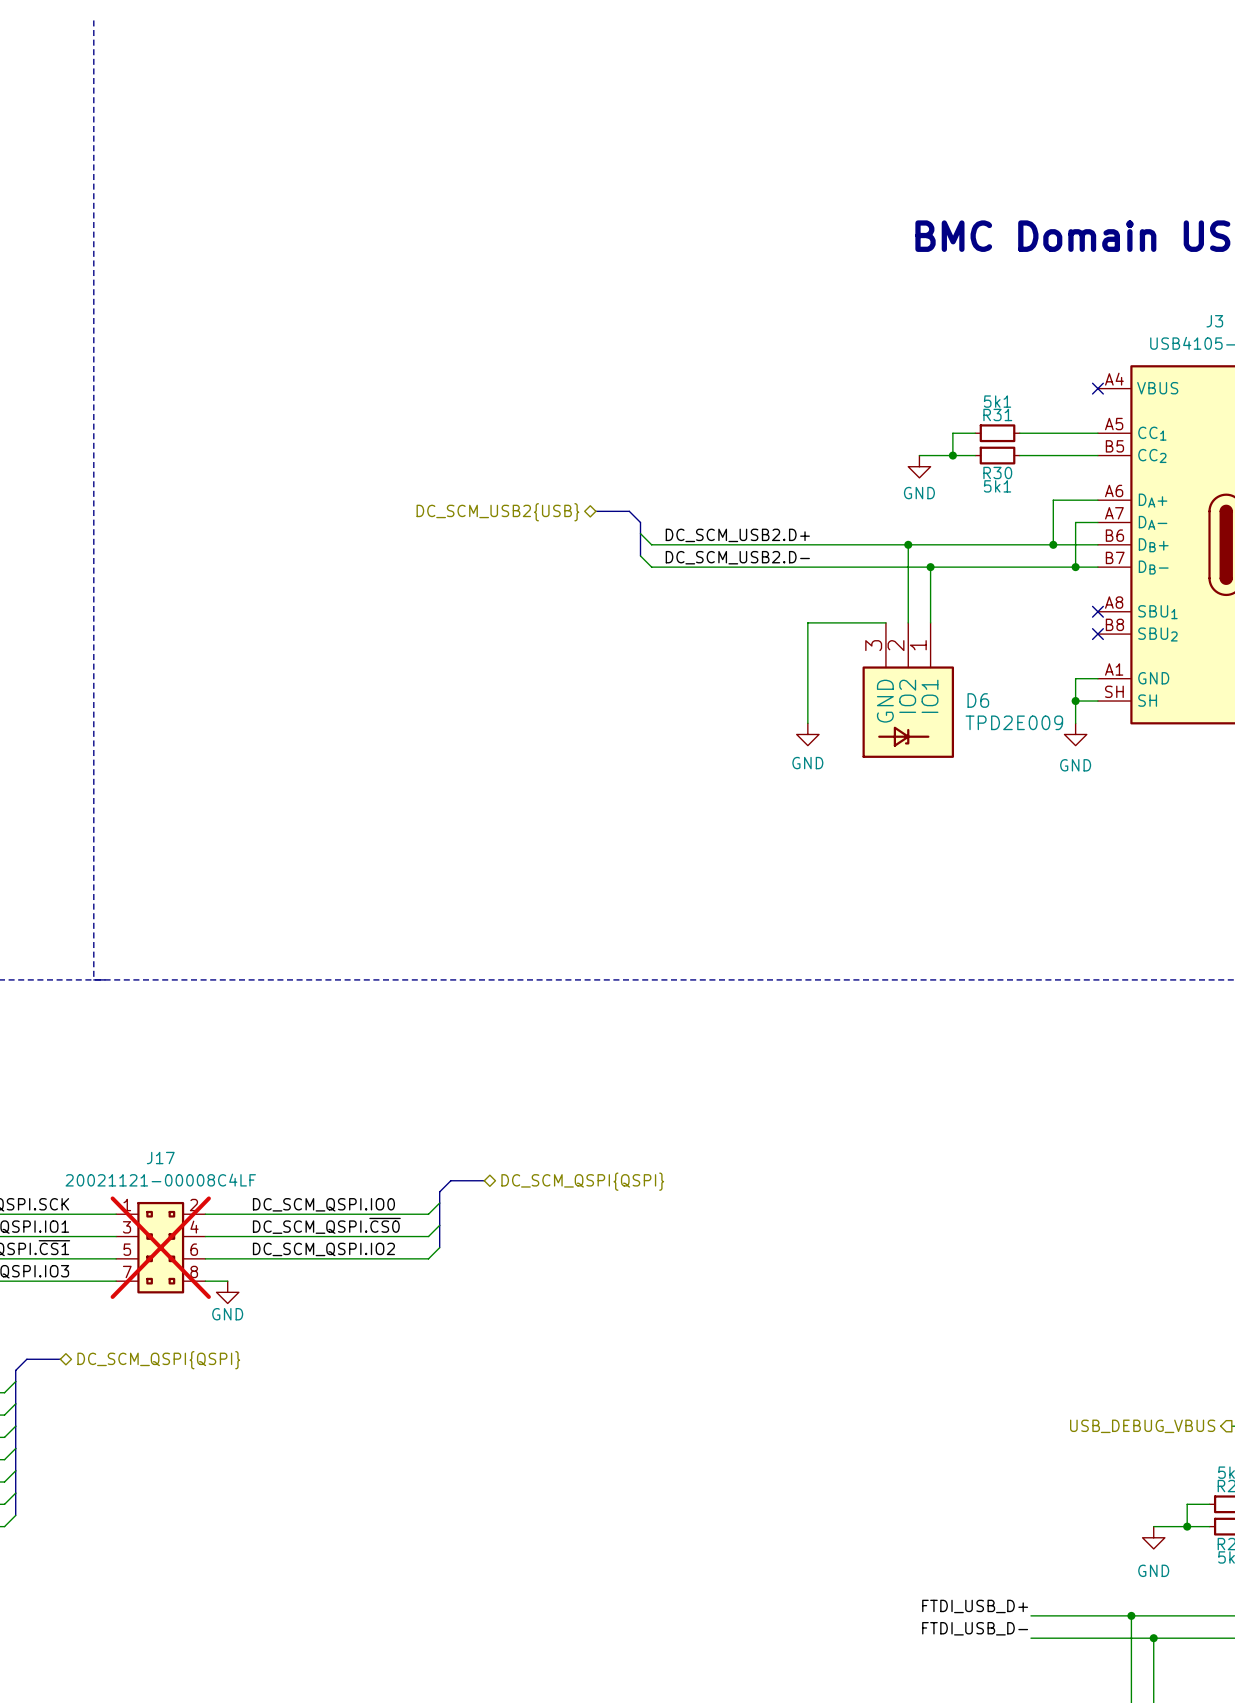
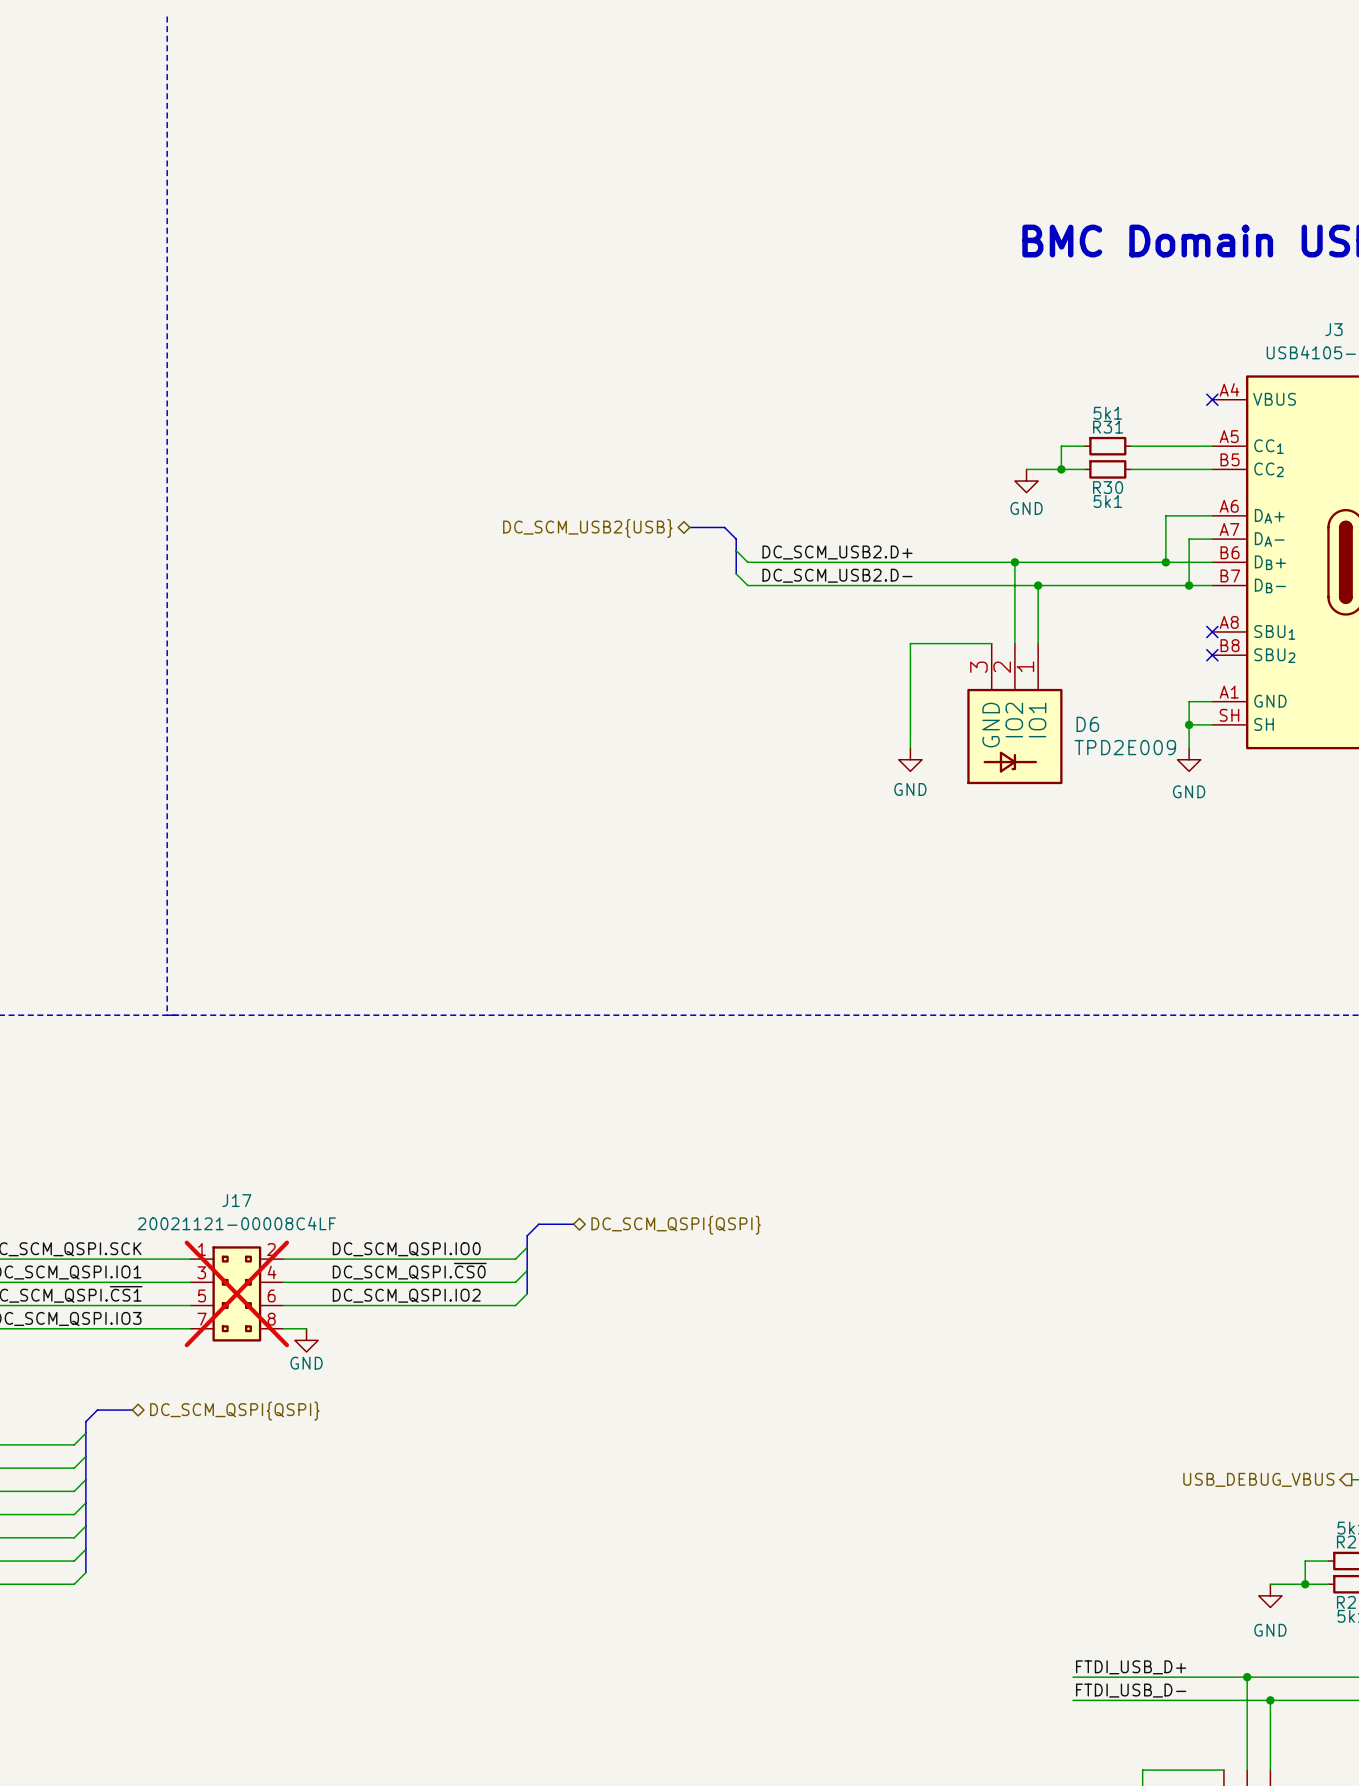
label position: FTDI_USB_D+ (975, 1606) -> FTDI_USB_D+ (1131, 1667)
wire: none -> (1072, 1677) (1142, 1677)
label position: FTDI_USB_D- (975, 1628) -> FTDI_USB_D- (1131, 1690)
wire: none -> (1072, 1700) (1142, 1700)

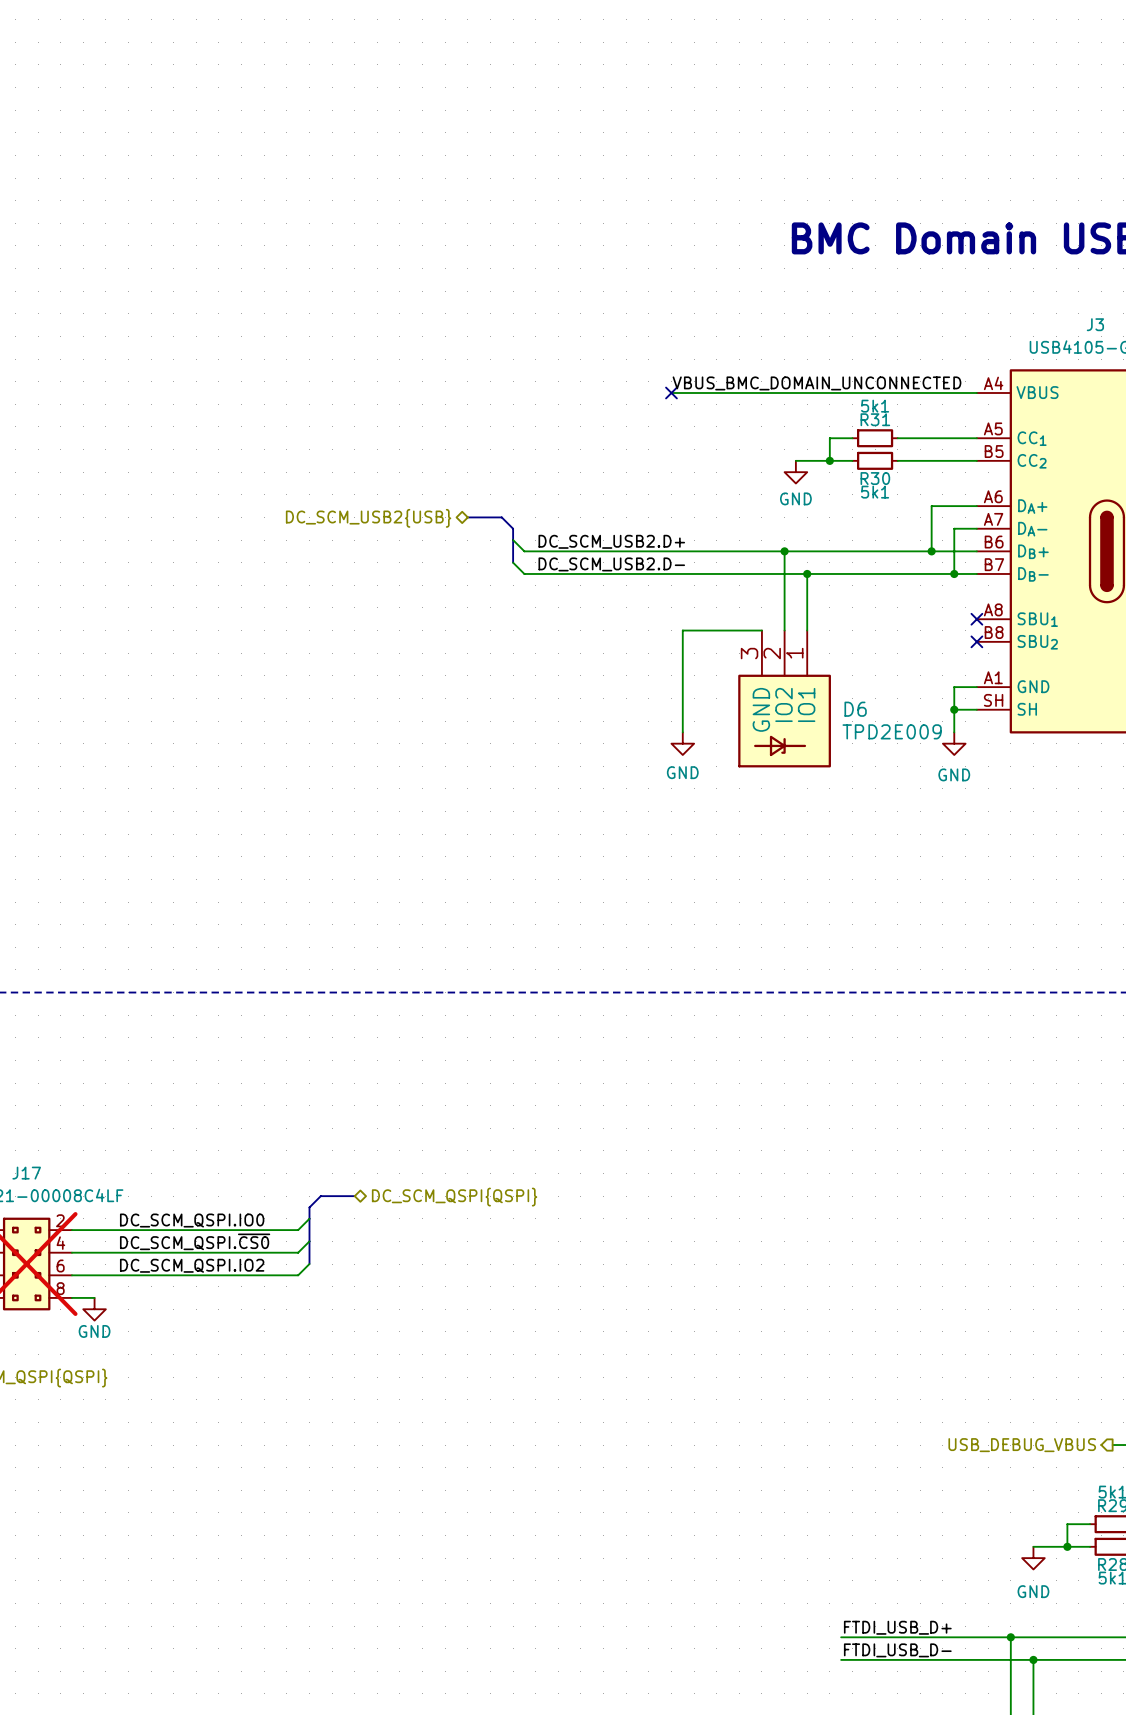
label: none -> VBUS_BMC_DOMAIN_UNCONNECTED (816, 383)
wire: none -> (671, 392) (976, 392)
no-connect mark: none -> (671, 392)
no-connect mark: (1212, 399) -> none

